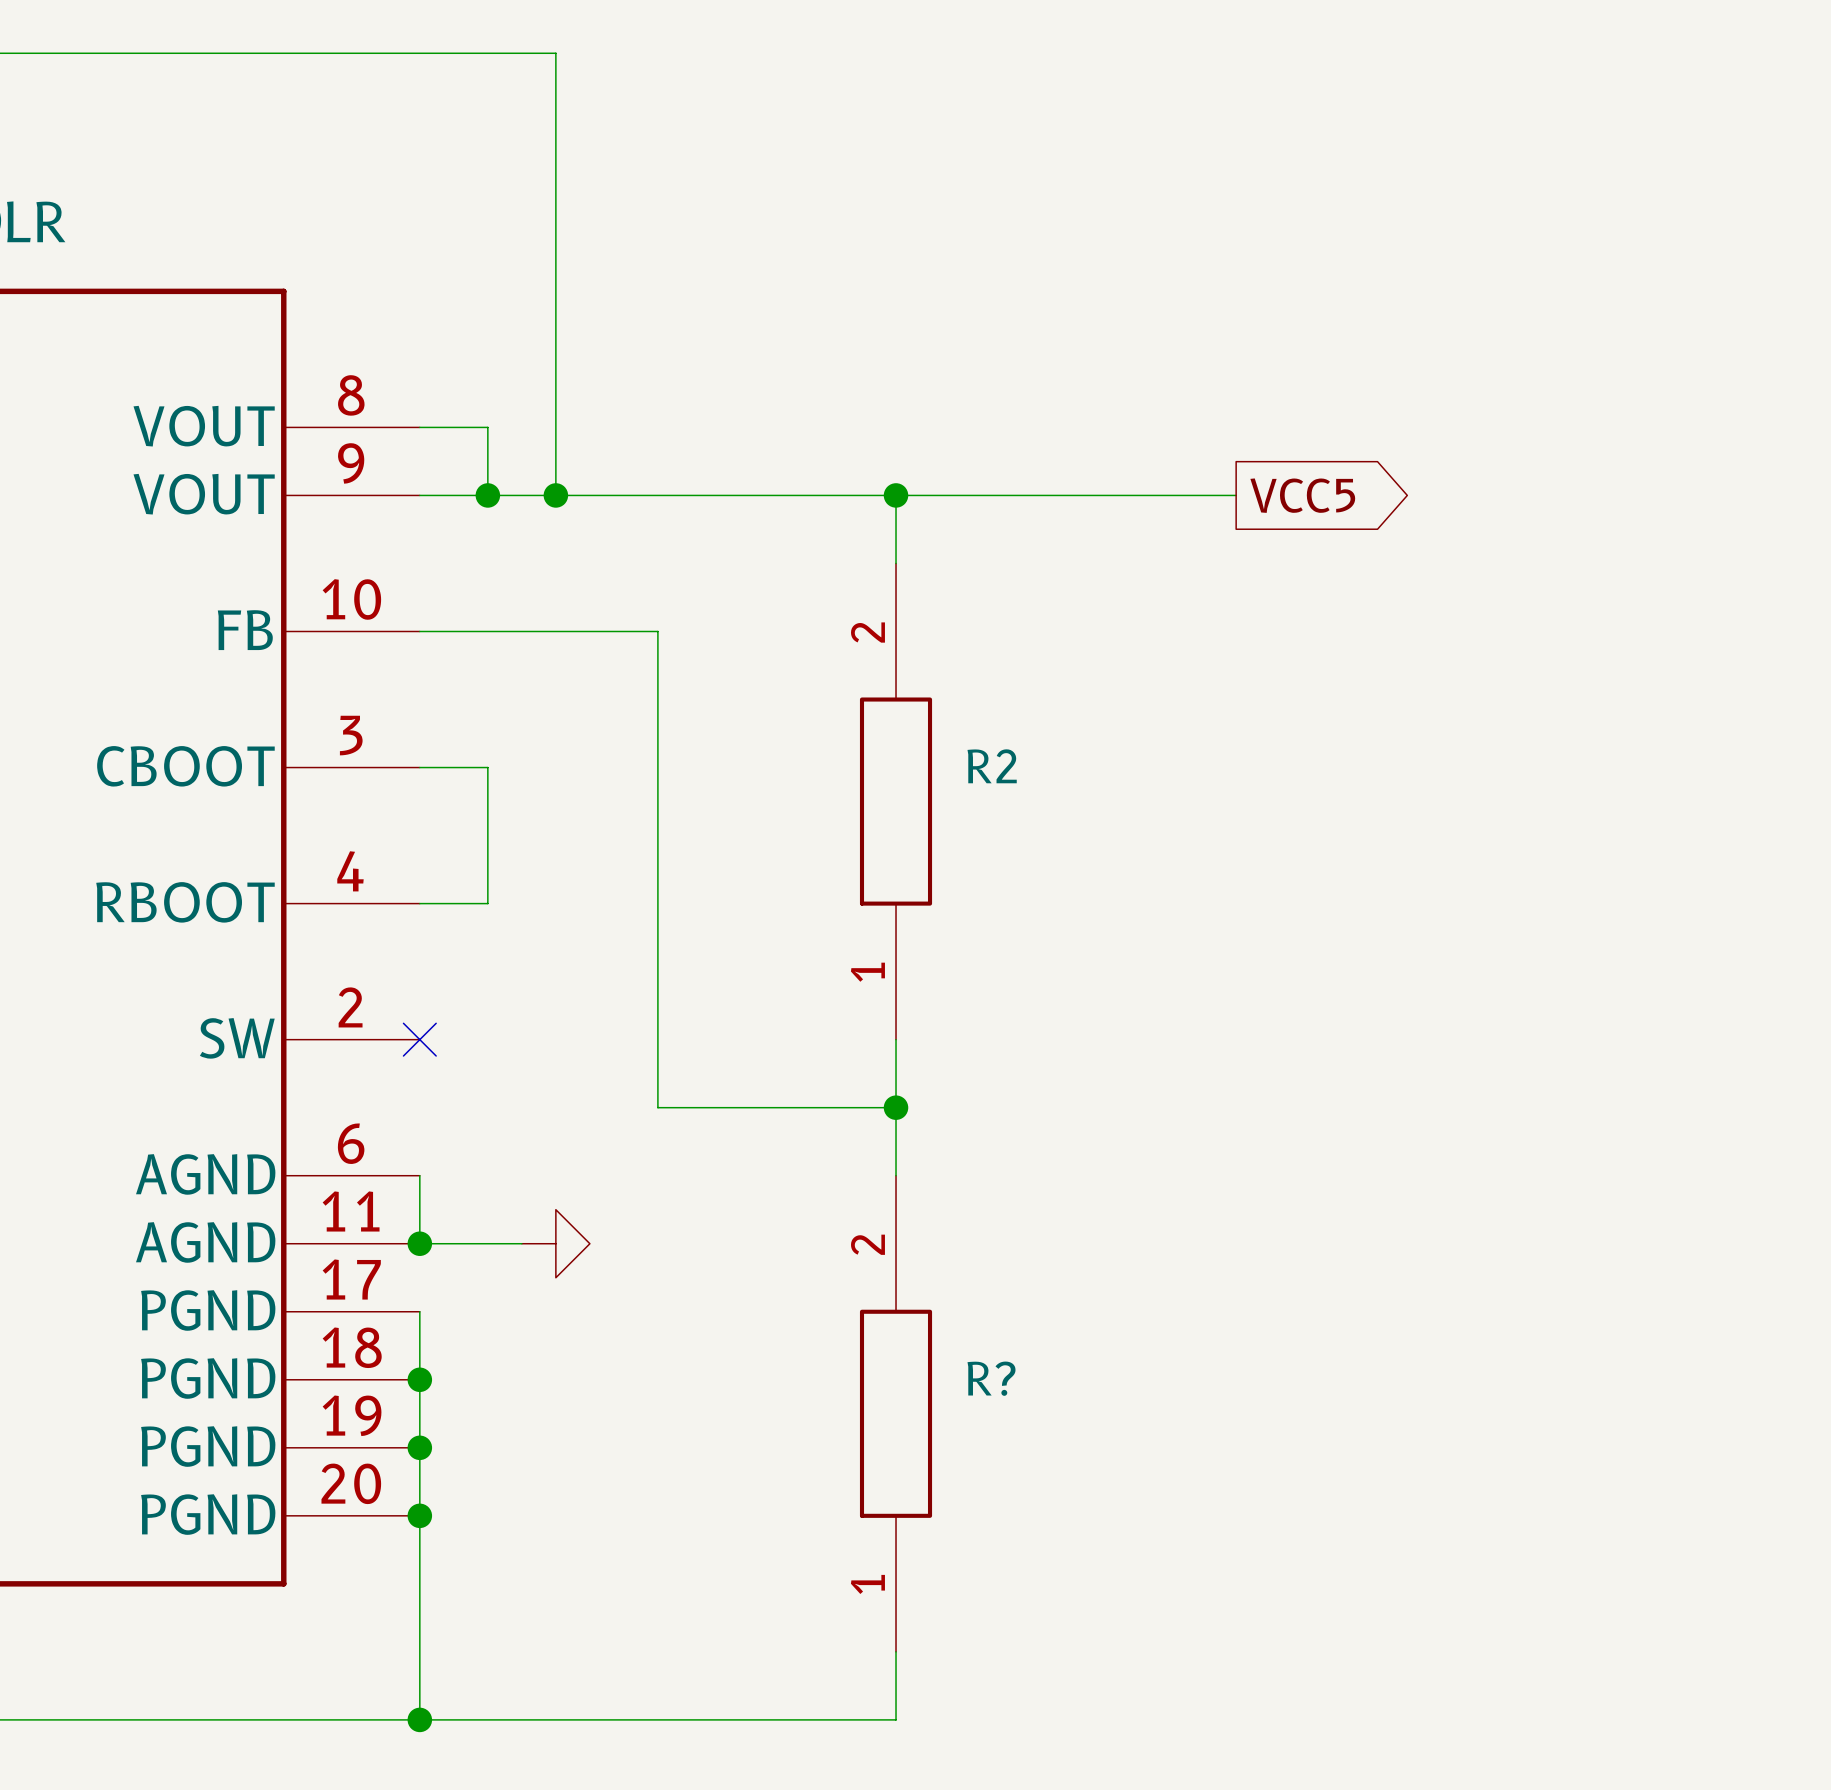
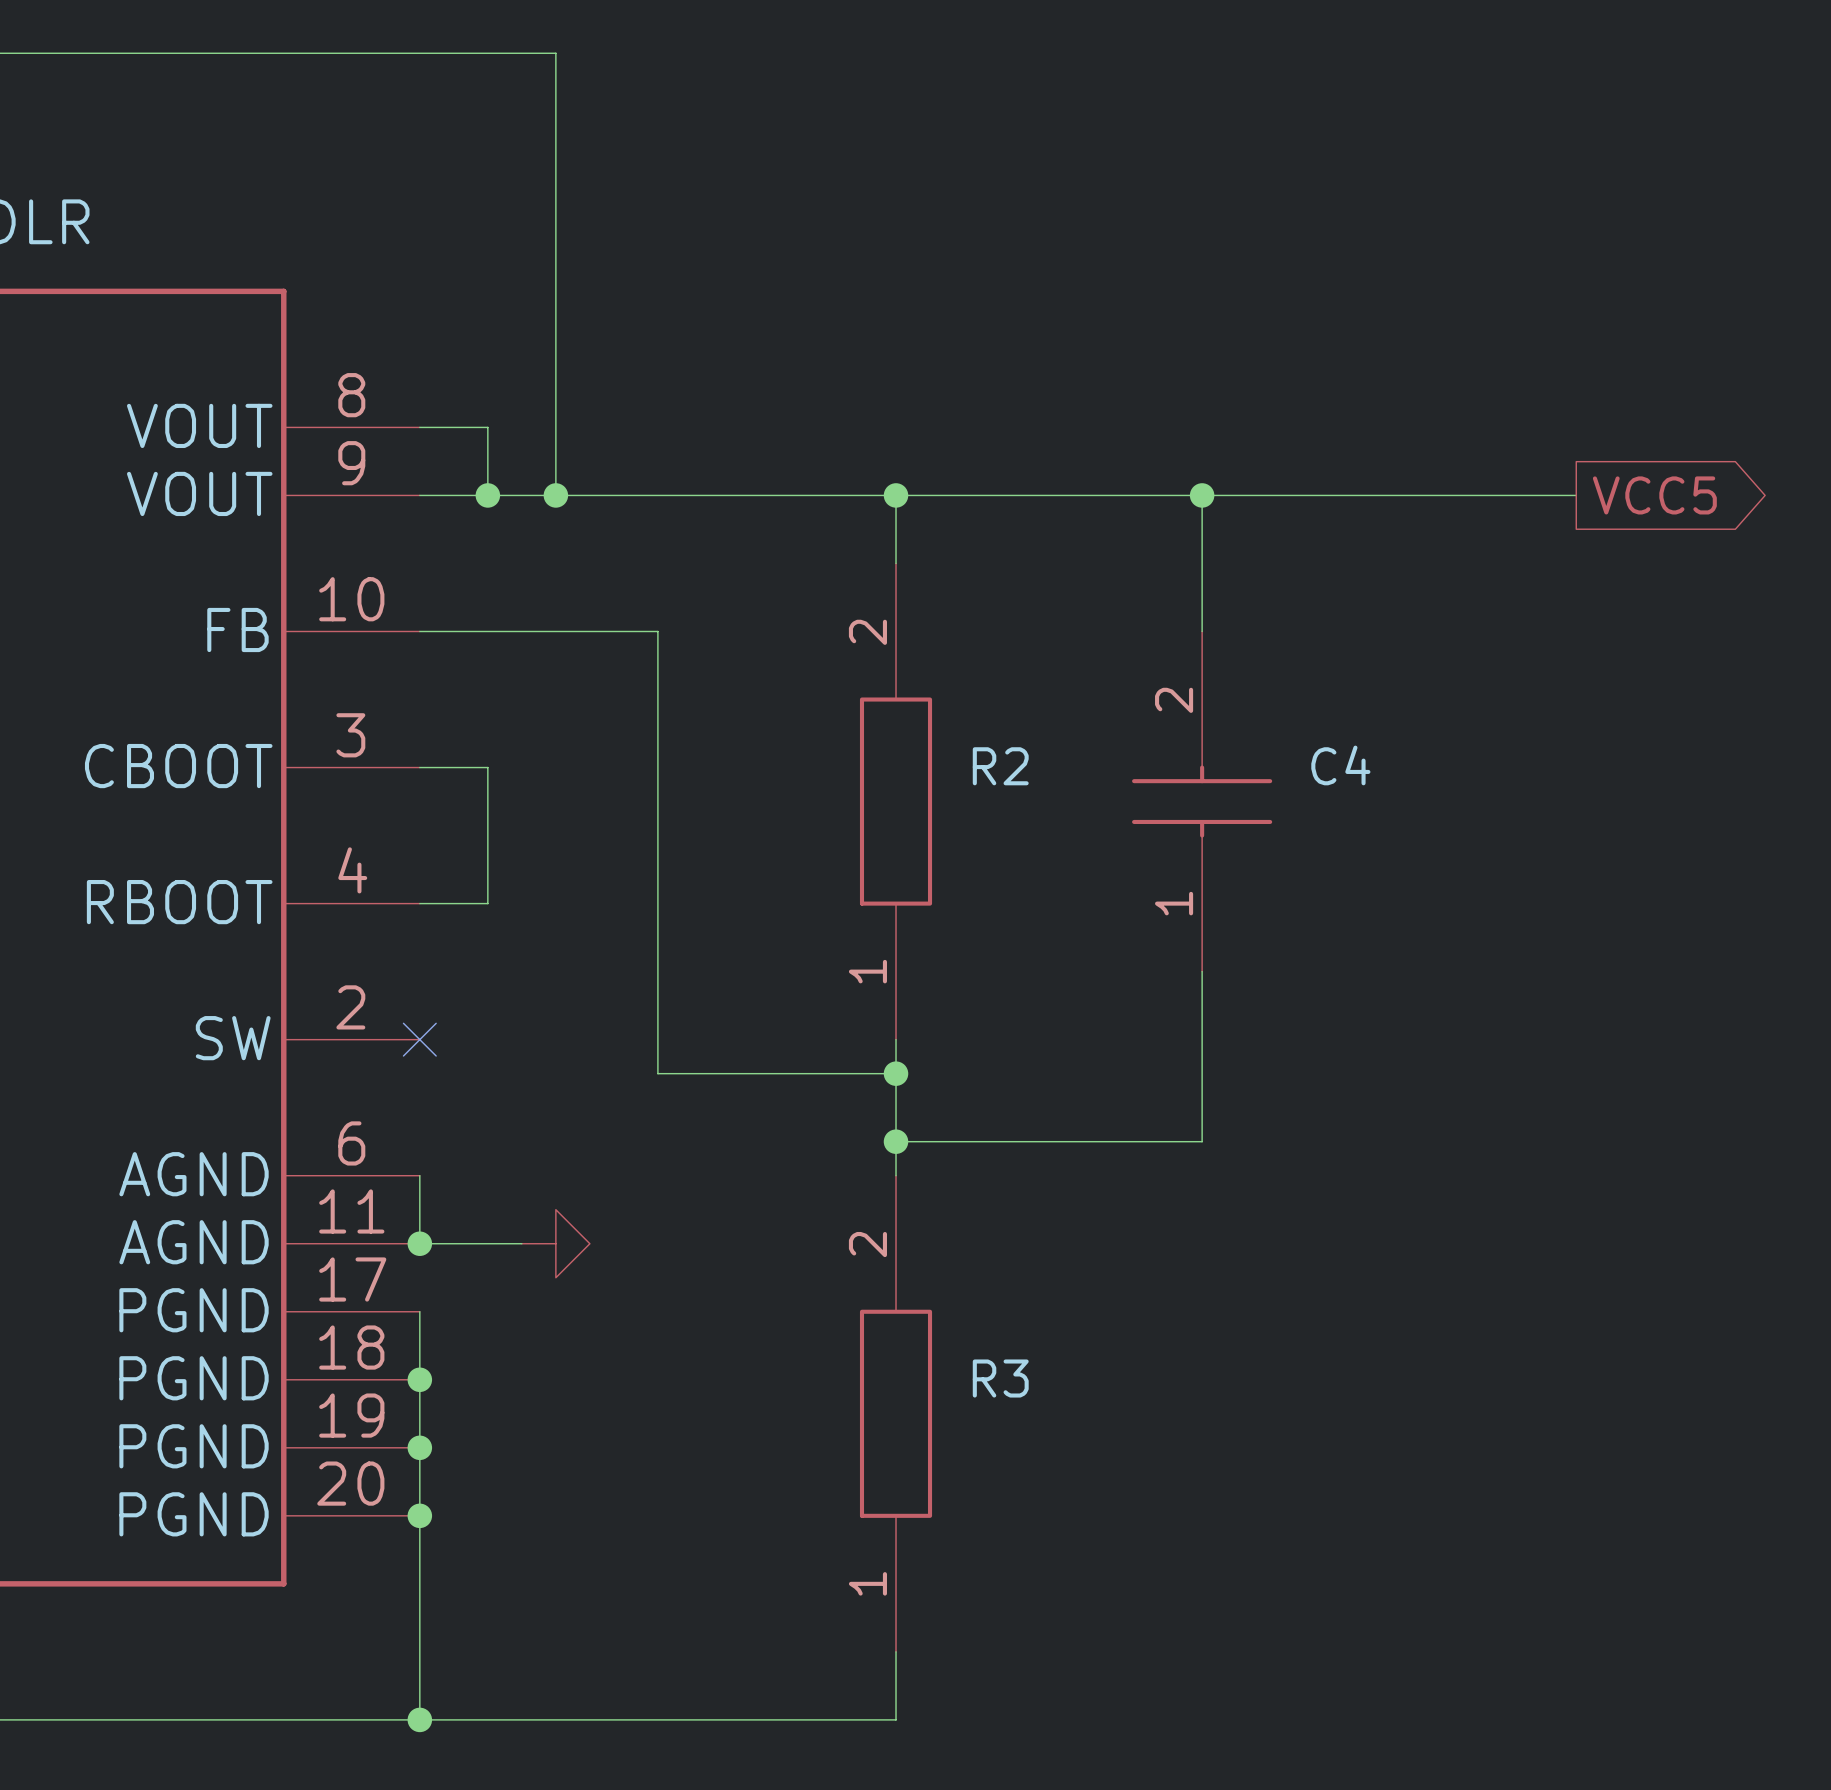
wire: none -> (1202, 495) (1202, 631)
junction: none -> (1202, 495)
wire: none -> (1236, 495) (1576, 495)
global label position: VCC5 (1302, 495) -> VCC5 (1654, 495)
C4: none -> (1202, 801)
wire: none -> (1202, 971) (1202, 1141) (896, 1141)
wire: (657, 1073) (657, 1107) (896, 1107) -> (657, 1073) (896, 1073)
junction: none -> (896, 1073)
junction: (896, 1107) -> none
junction: none -> (896, 1141)
R? name: R? (991, 1378) -> R3 (1000, 1378)

